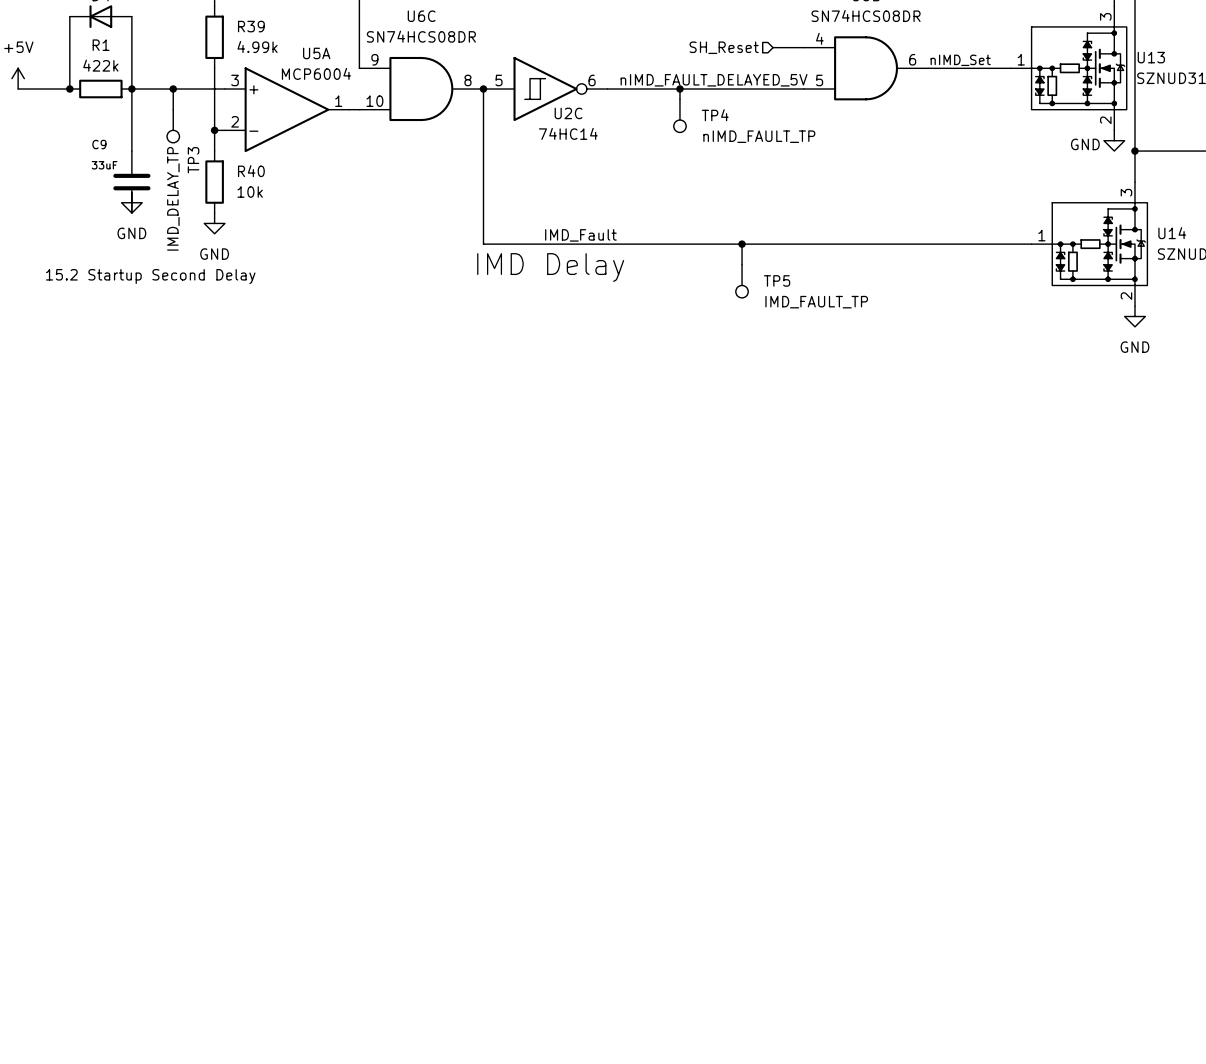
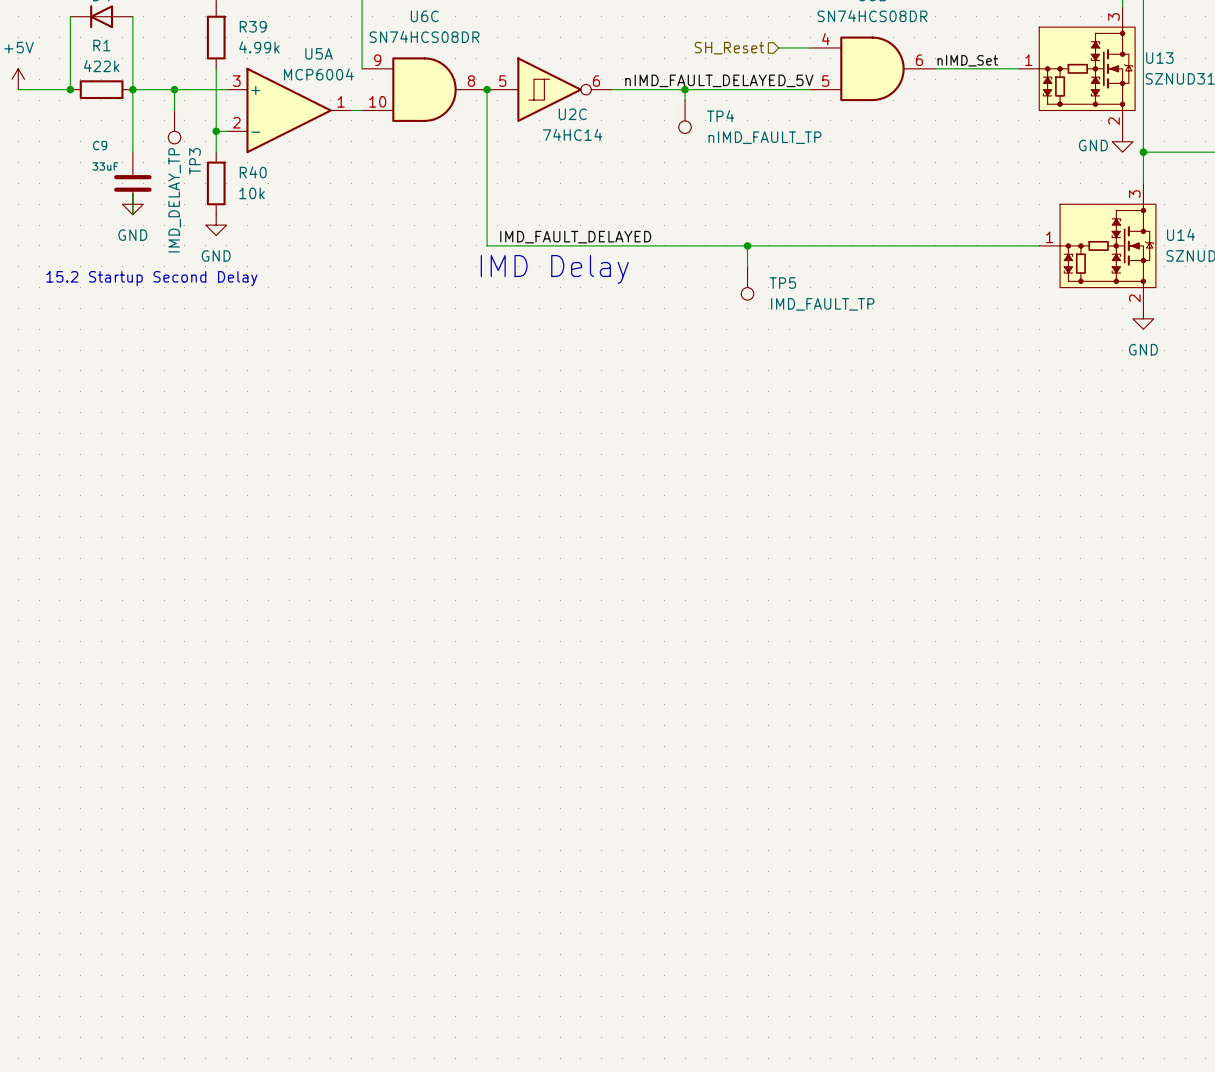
label: none -> IMD_FAULT_DELAYED (575, 237)
label: IMD_Fault (580, 235) -> none

